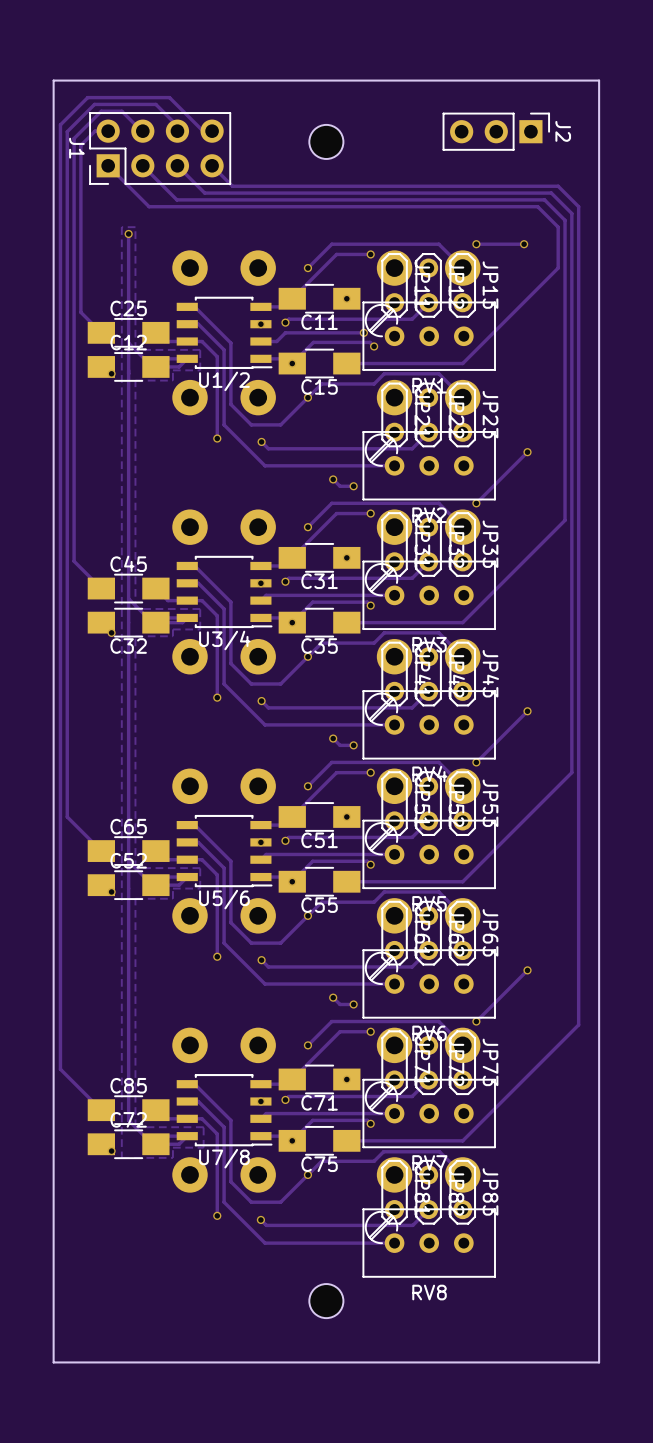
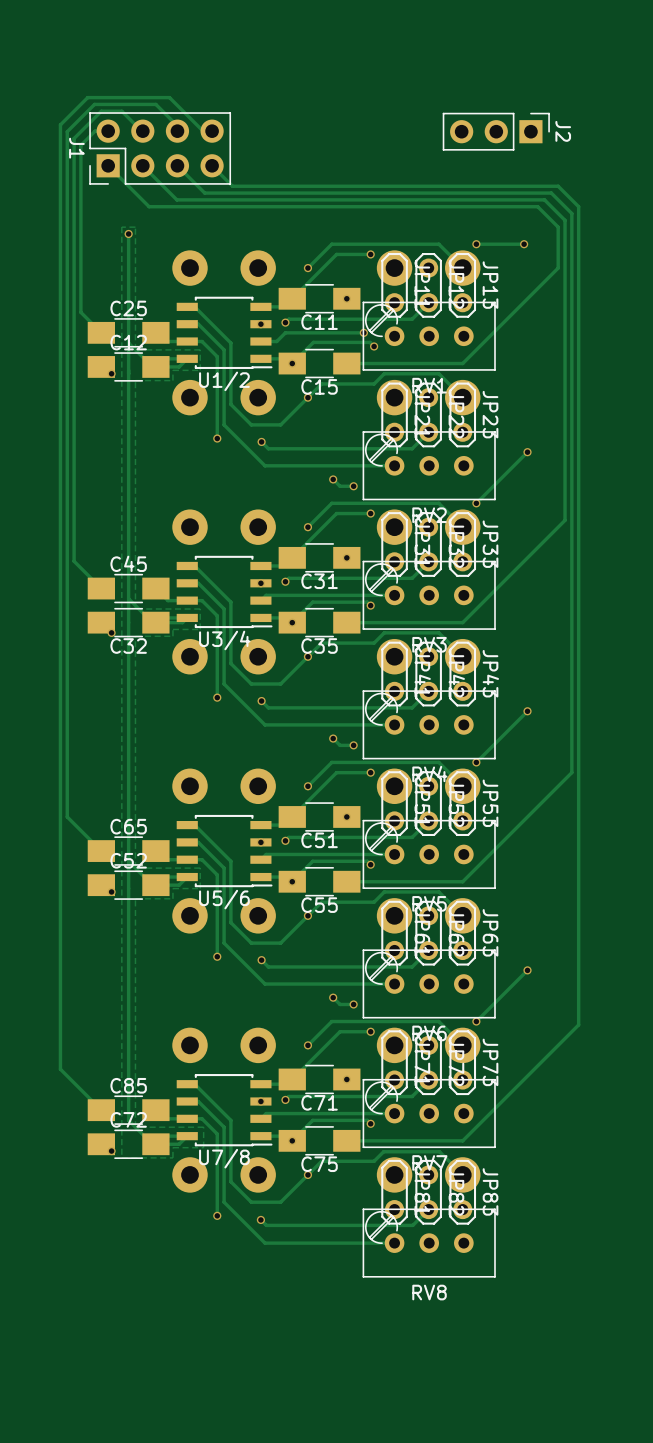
board edge: (599, 80) (599, 1362) (53, 1362) (53, 80) (599, 80) -> none
part: (326, 141) -> none
part: (326, 1301) -> none

